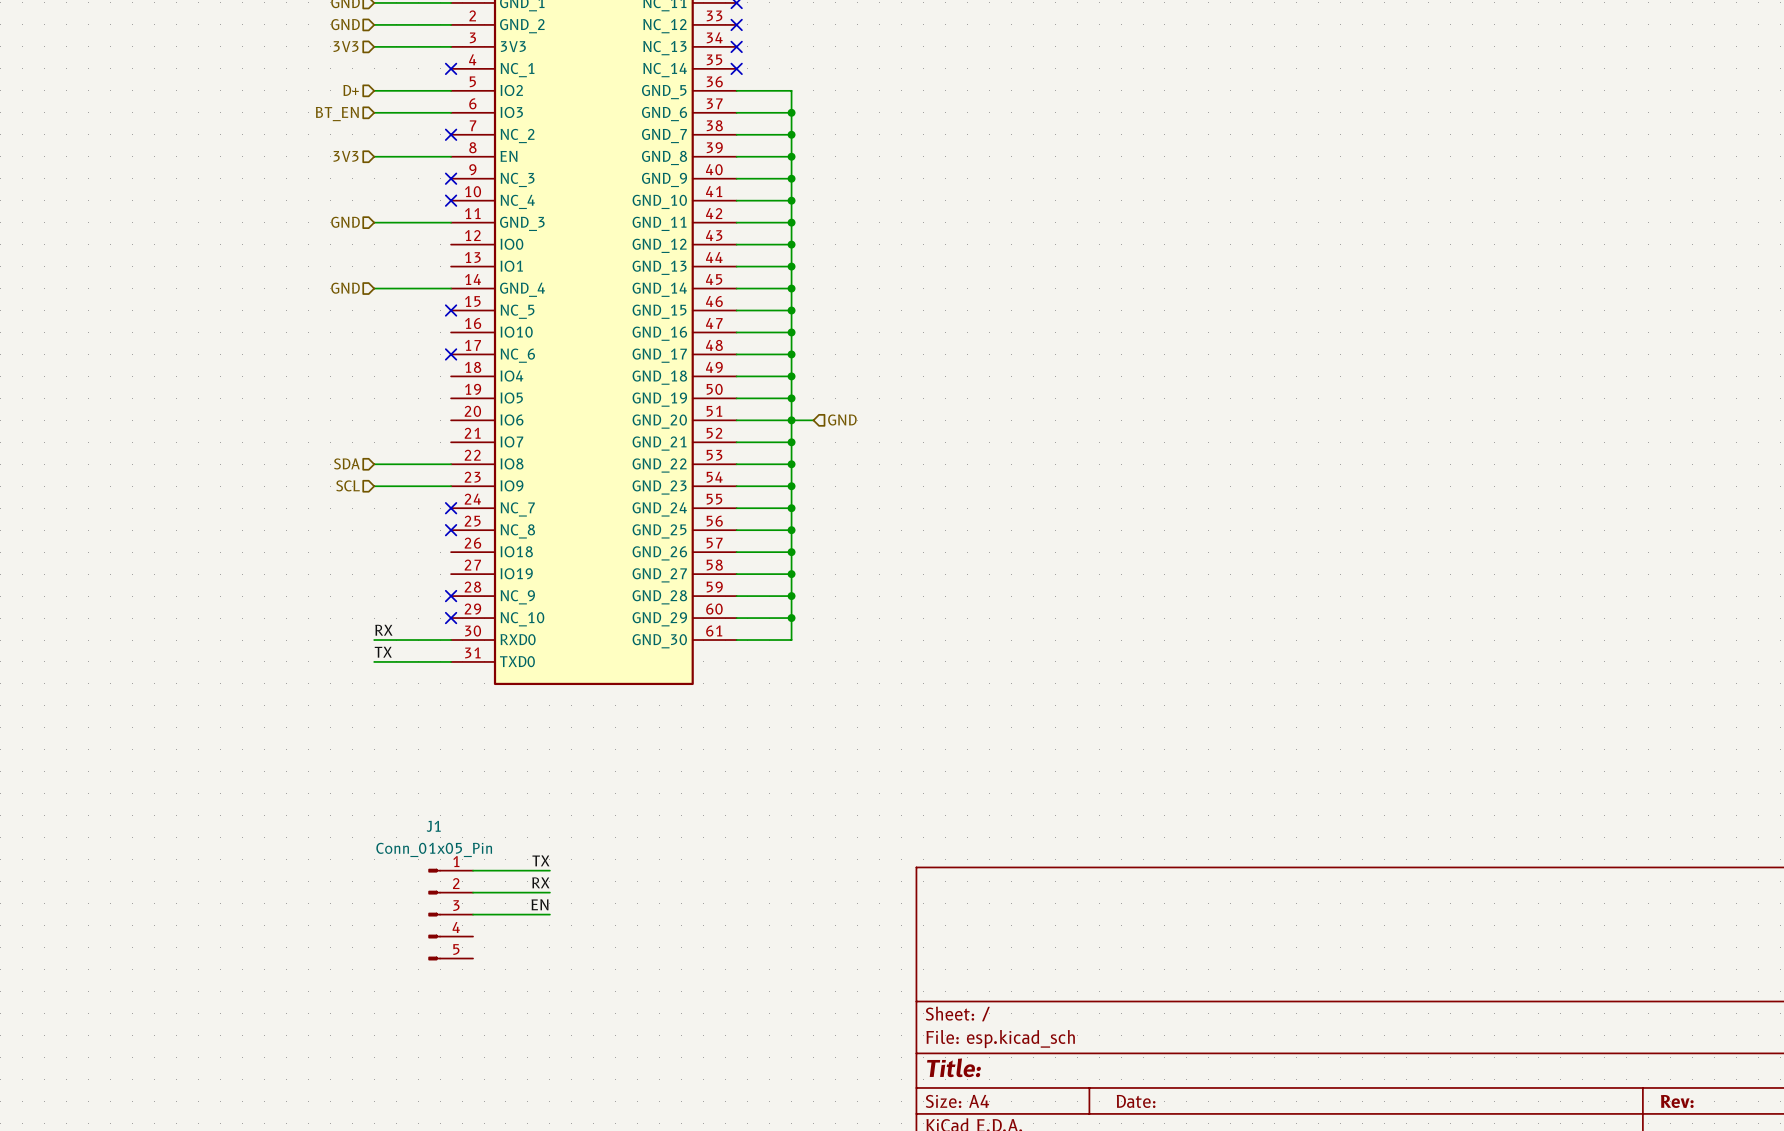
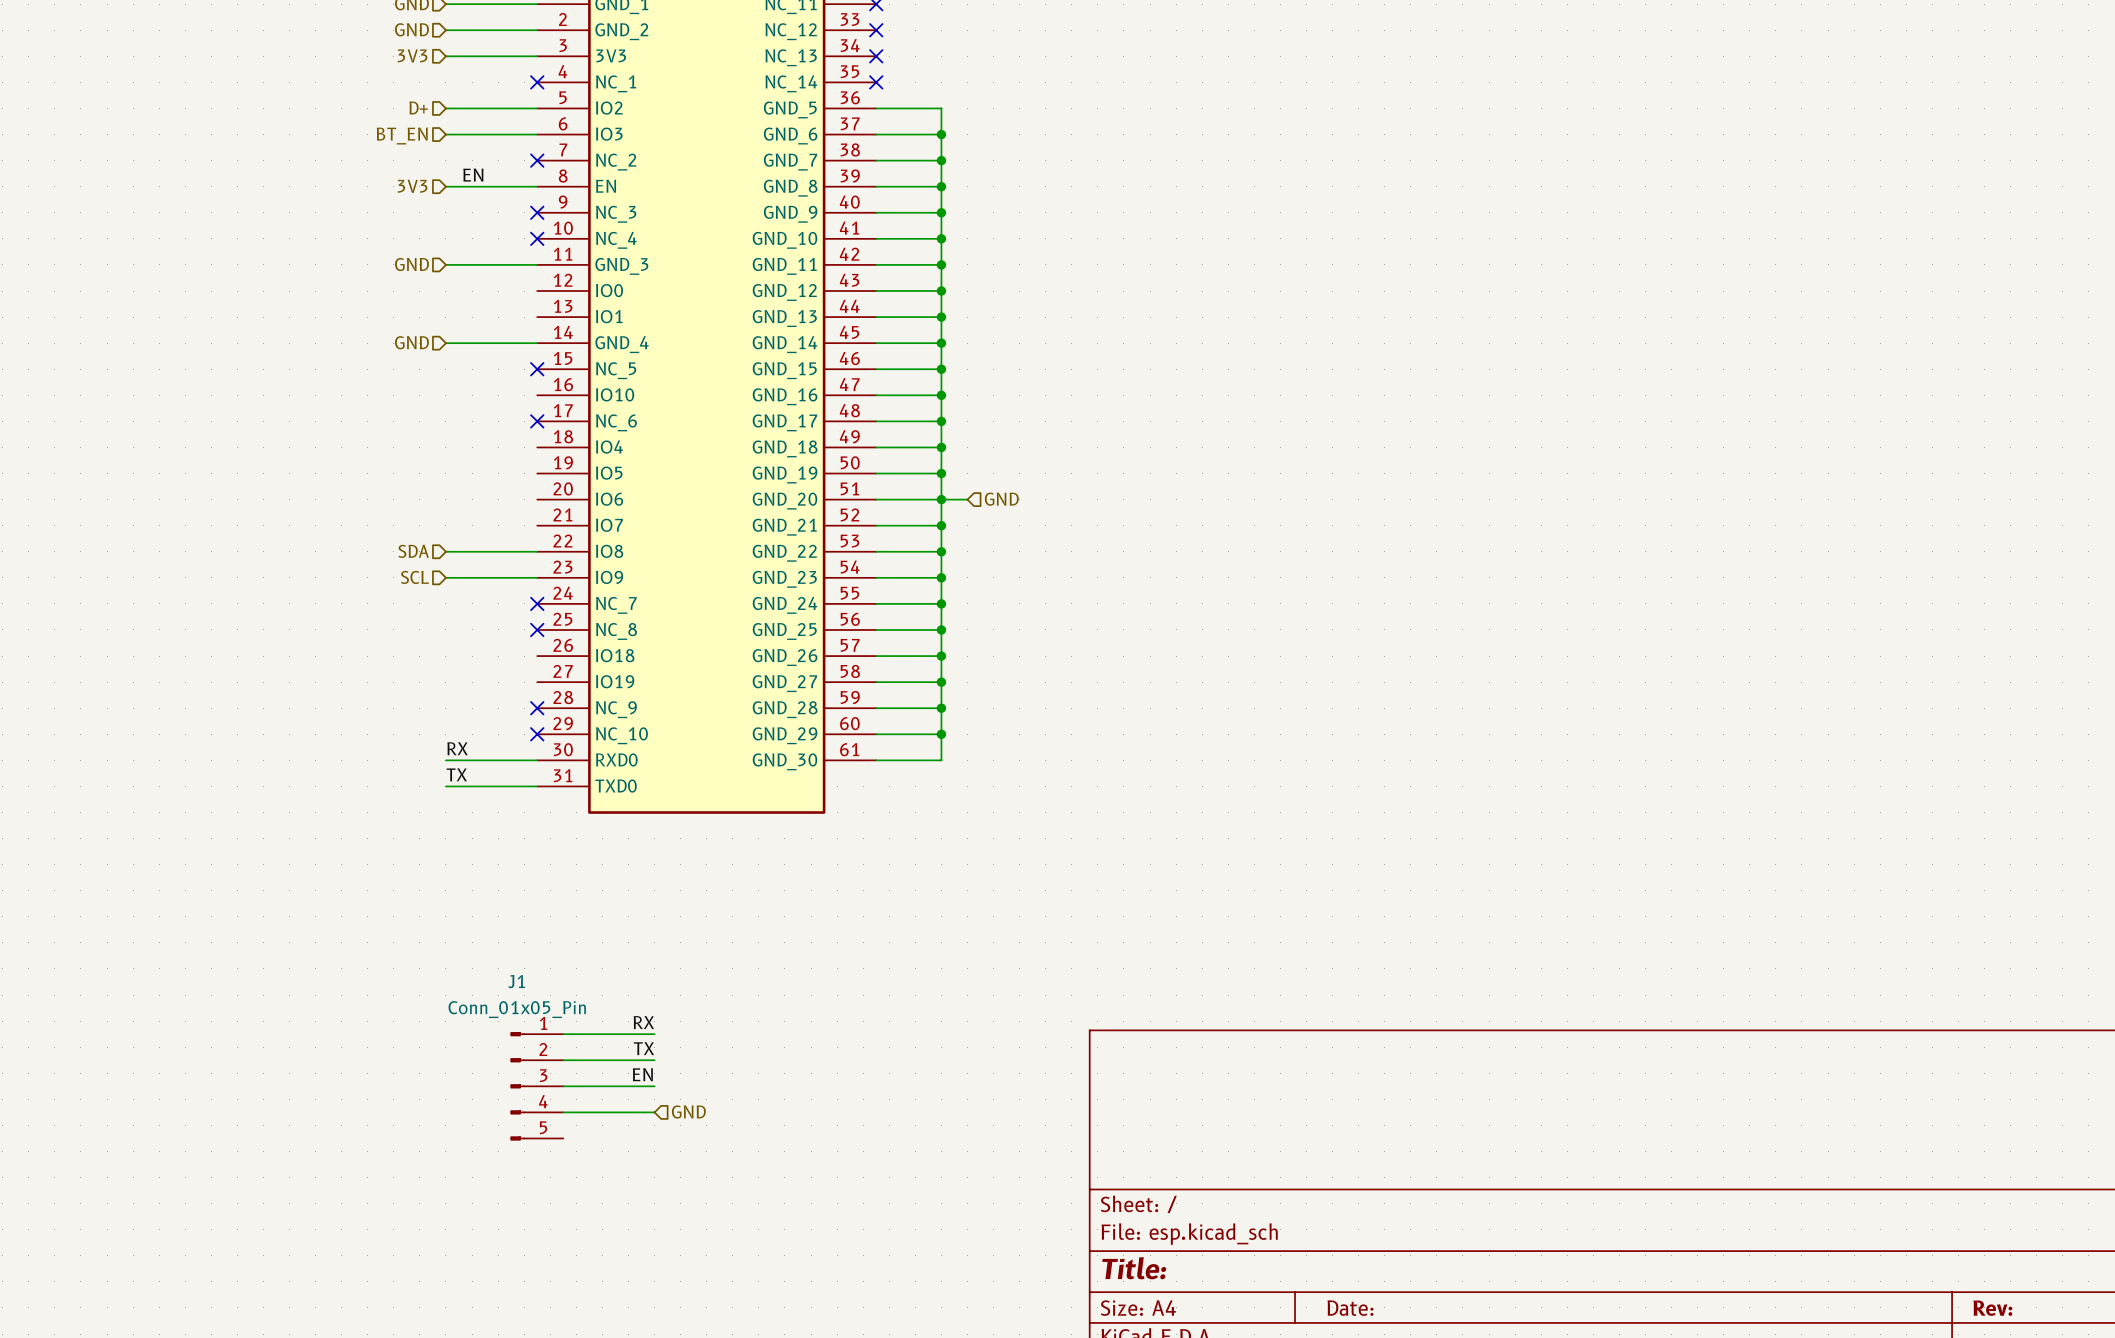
label: none -> EN (473, 175)
label: TX (540, 860) -> RX (643, 1022)
label: RX (540, 882) -> TX (643, 1048)
wire: none -> (563, 1112) (654, 1112)
hierarchical label: none -> GND (688, 1111)

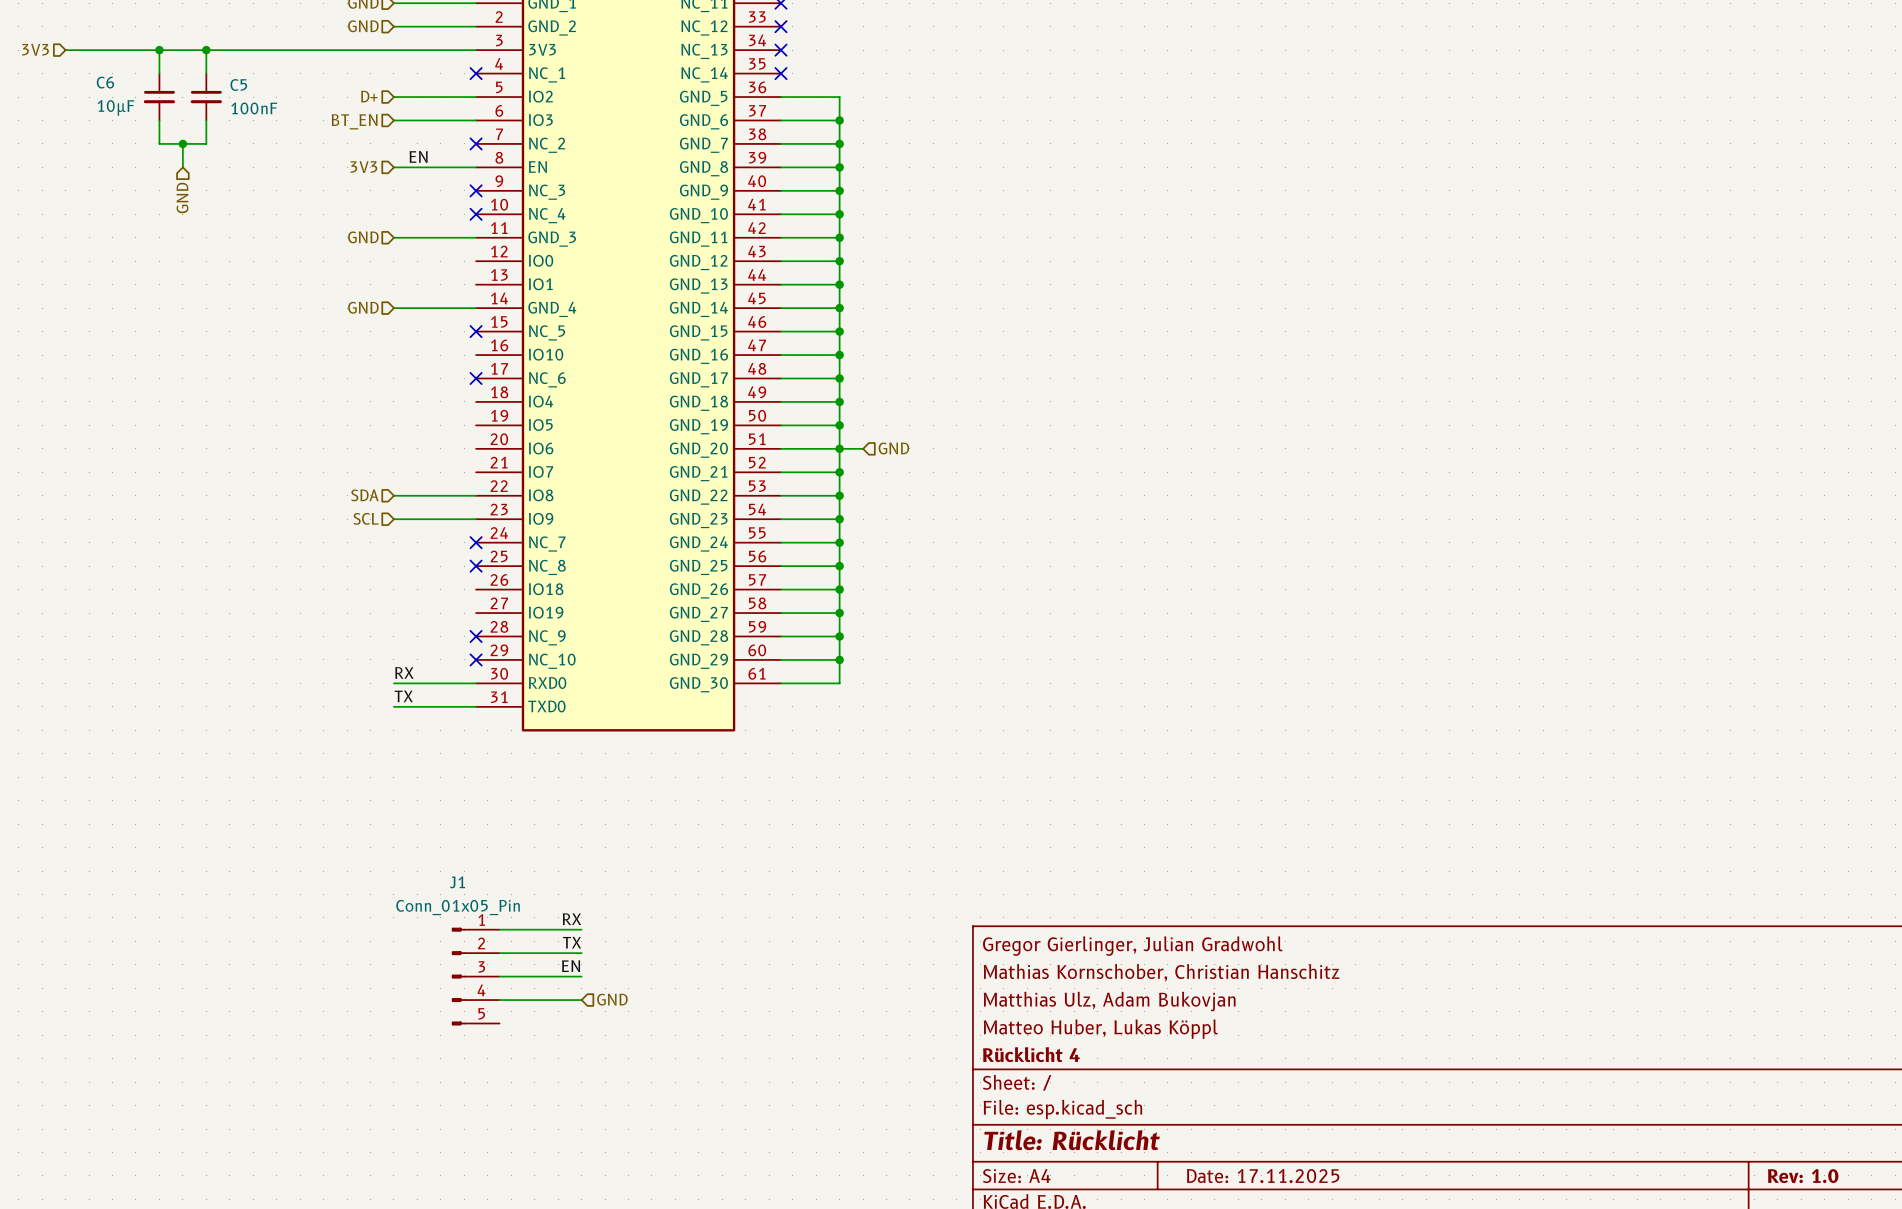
hierarchical label: none -> 3V3 (35, 49)
hierarchical label: 3V3 (412, 55) -> none
wire: none -> (65, 50) (393, 50)
wire: none -> (159, 50) (159, 73)
junction: none -> (159, 50)
wire: none -> (206, 50) (206, 73)
junction: none -> (206, 50)
C6: none -> 10µF (159, 97)
C5: none -> 100nF (206, 97)
wire: none -> (159, 120) (159, 143) (206, 143) (206, 120)
wire: none -> (182, 143) (182, 167)
junction: none -> (182, 143)
hierarchical label: none -> GND (182, 197)
title block: none -> Gregor Gierlinger, Julian Gradwohl (1132, 946)
title block: none -> Mathias Kornschober, Christian Hanschitz (1161, 972)
title block: none -> Matthias Ulz, Adam Bukovjan (1109, 1001)
title block: none -> Matteo Huber, Lukas Köppl (1100, 1029)
title block: none -> Rücklicht 4 (1031, 1054)
title block: Title: (1134, 1268) -> Title: Rücklicht (1072, 1140)
title block: Date: (1350, 1308) -> Date: 17.11.2025 (1263, 1176)
title block: Rev: (1992, 1308) -> Rev: 1.0 (1803, 1176)

